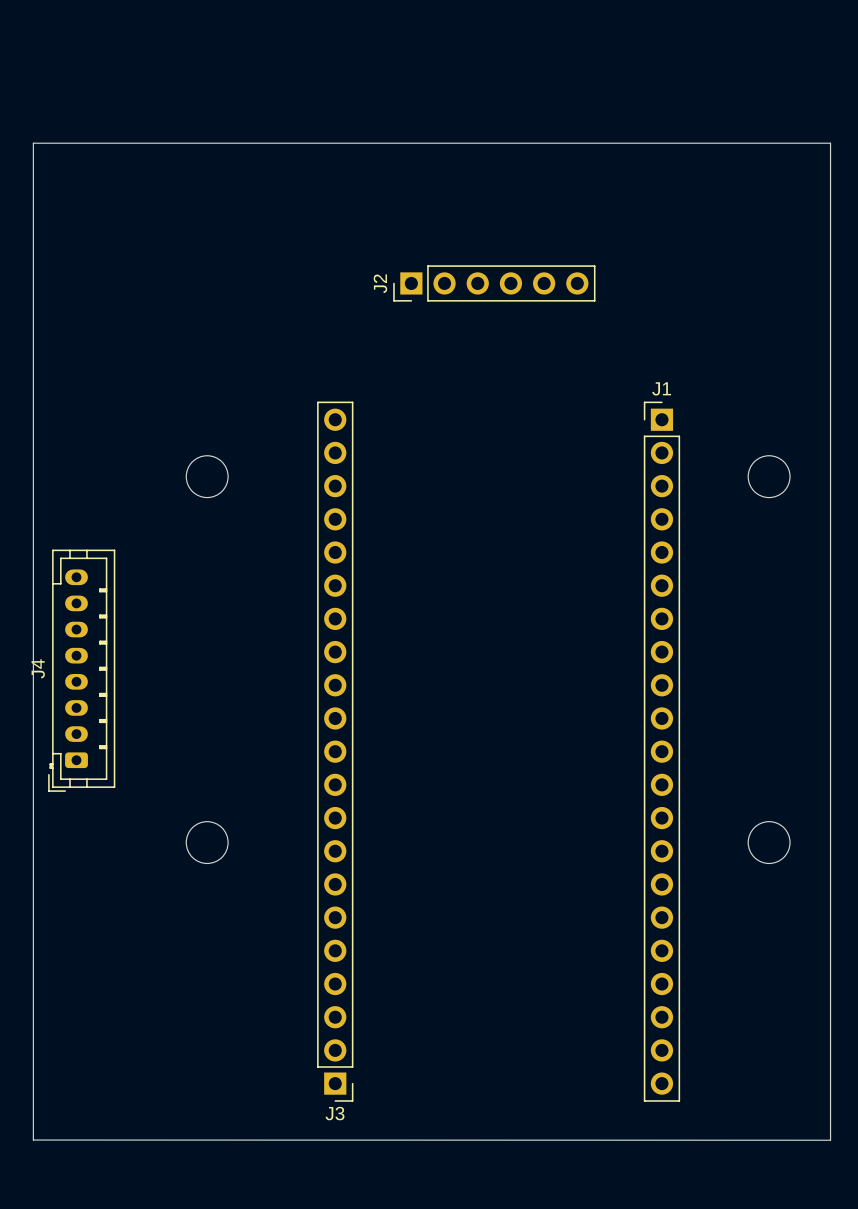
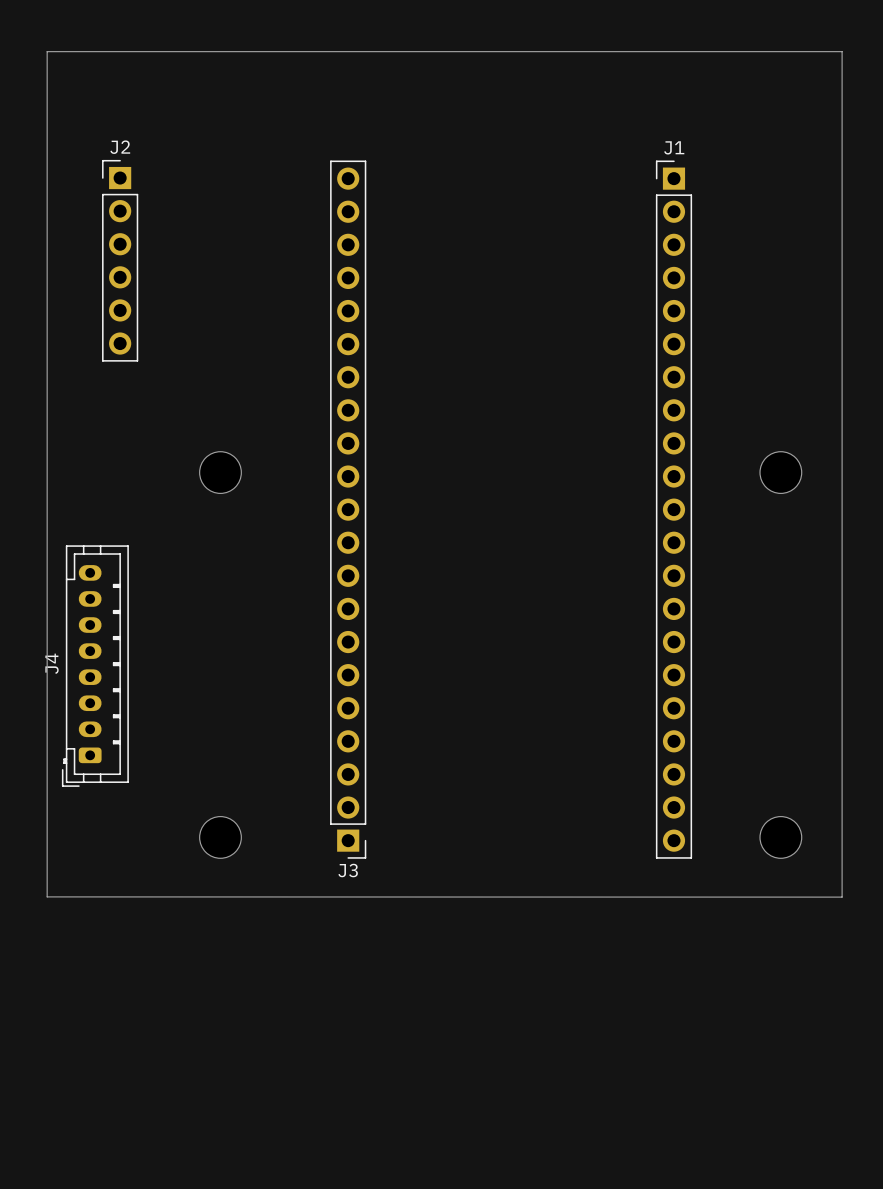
board edge: (33, 143) (830, 143) -> (47, 140) (47, 51) (842, 51) (842, 140)
J2 rotation: 0° (494, 283) -> 90° clockwise (120, 260)
J2 position: (494, 283) -> (120, 260)
J3 position: (335, 751) -> (348, 509)
J1 position: (661, 751) -> (673, 509)
board edge: (33, 902) (33, 1140) (830, 1140) (830, 902) -> (47, 896) (842, 897)

